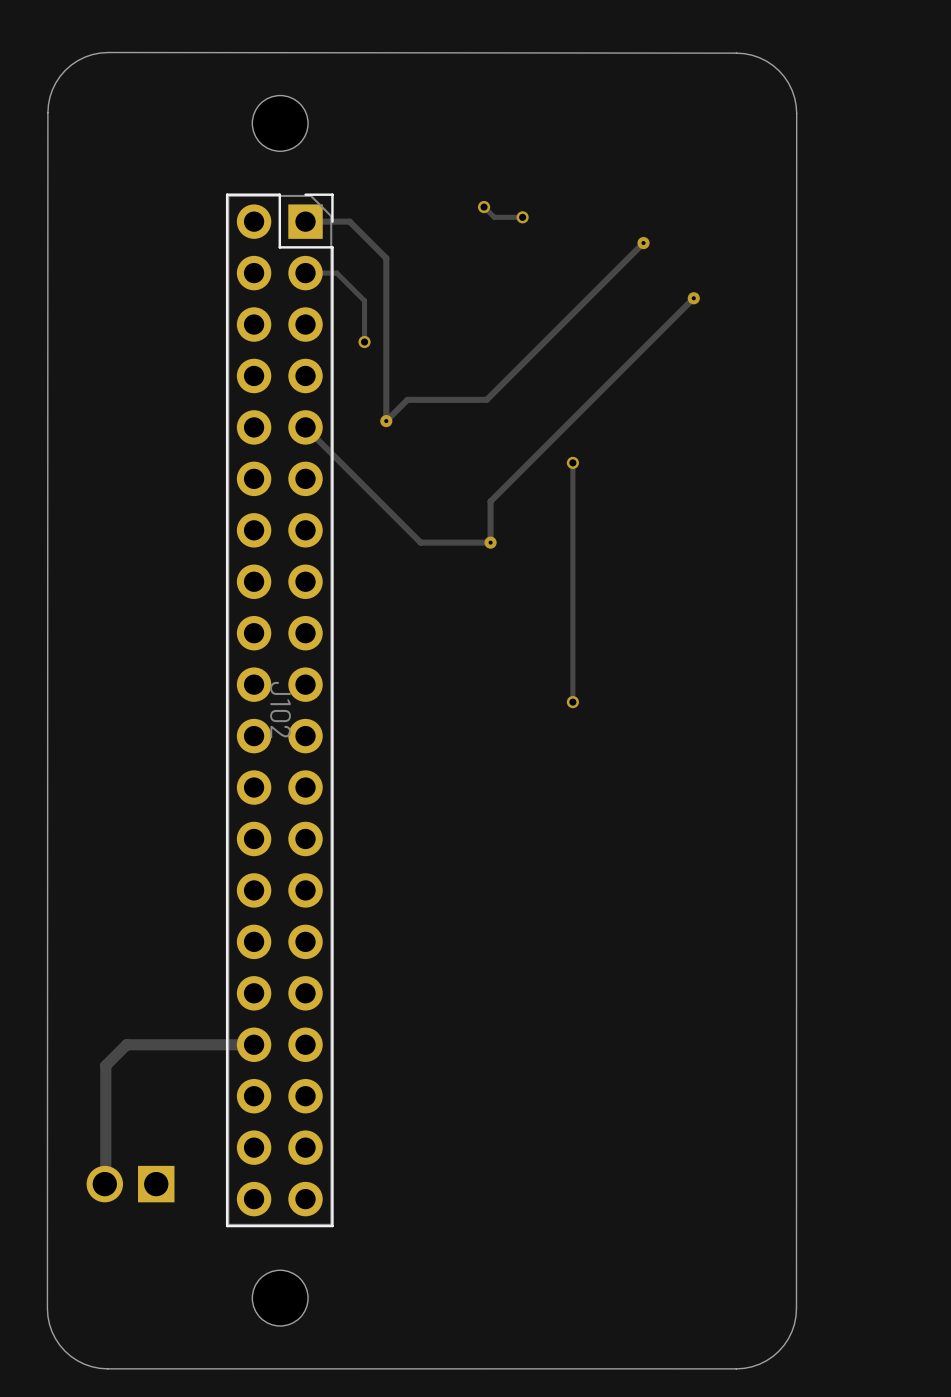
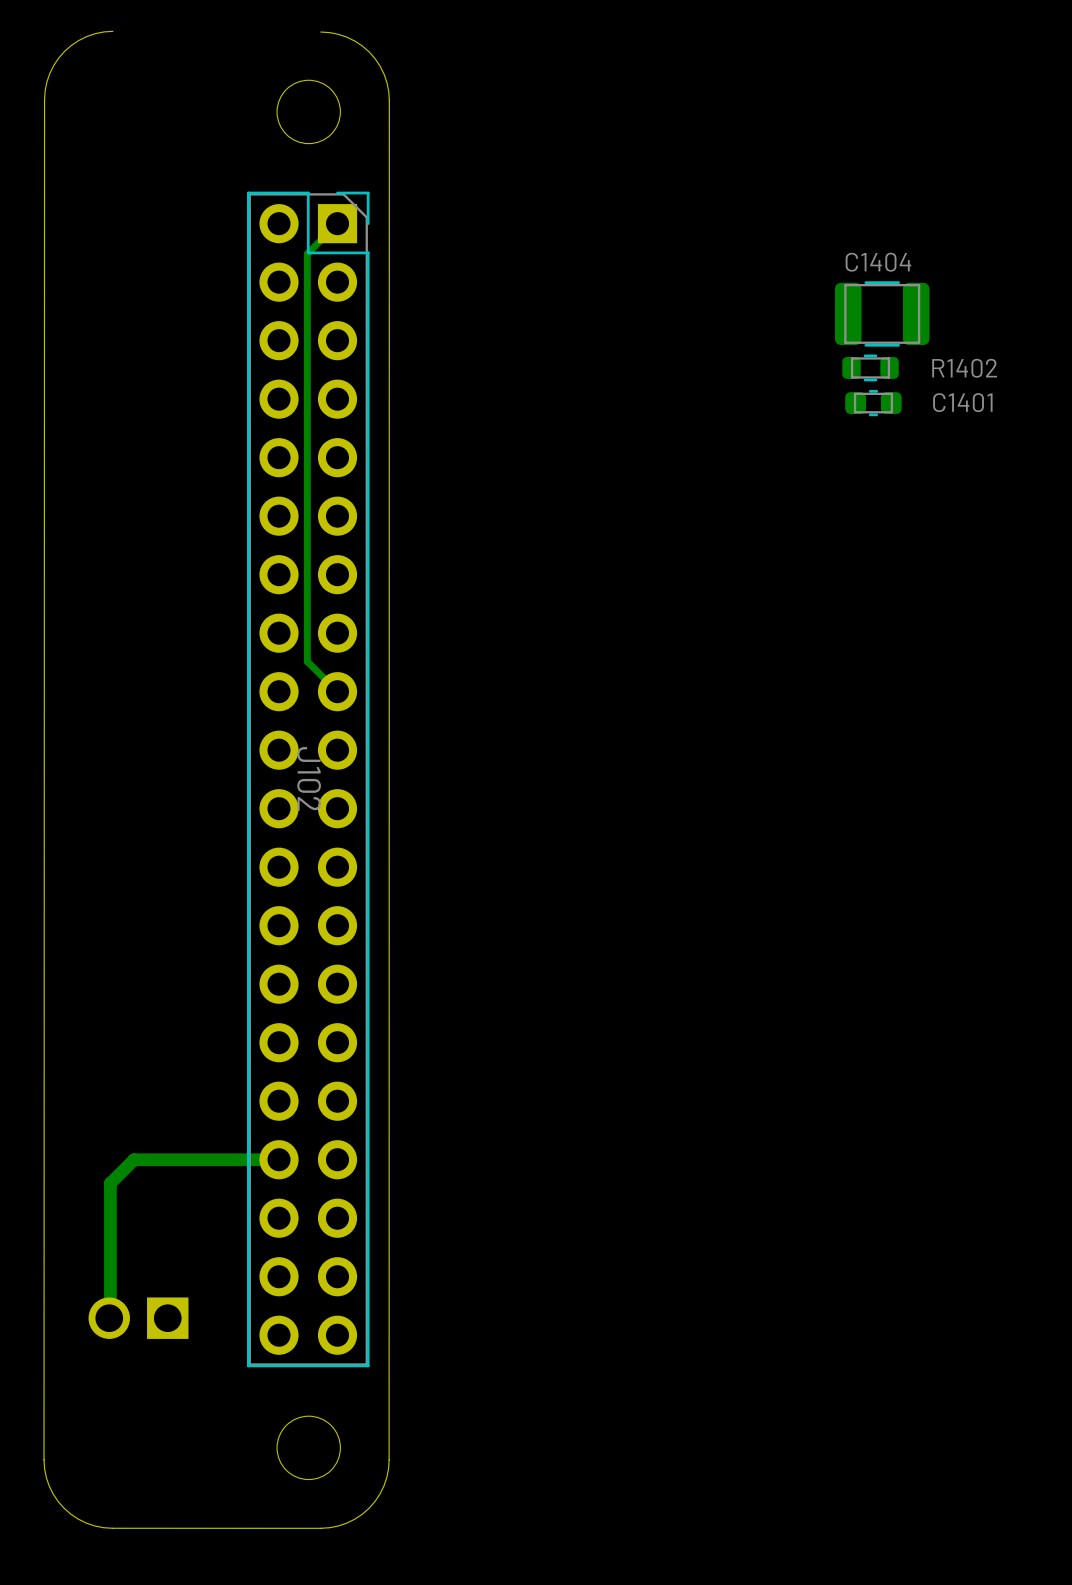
board edge: (108, 52) (736, 53) (752, 55) (766, 61) (779, 70) (788, 83) (794, 97) (796, 113) (796, 1308) (791, 1331) (778, 1351) (766, 1360) (744, 1368) (107, 1368) -> (320, 32) (347, 37) (369, 52) (384, 74) (389, 100) (388, 1468) (383, 1486) (375, 1501) (362, 1514) (338, 1525) (320, 1528) (112, 1528)
track: (484, 207) (494, 217) (522, 217) -> none
via: (484, 207) -> none
via: (522, 217) -> none
track: (305, 221) (349, 221) (386, 258) (386, 421) (407, 399) (486, 399) (643, 243) -> (337, 223) (307, 253) (307, 661) (337, 691)
via: (643, 243) -> none
track: (305, 273) (336, 273) (364, 300) (364, 341) -> none
track: (693, 298) (490, 501) (490, 542) (420, 542) (305, 427) -> none
via: (693, 298) -> none
C1404: none -> (882, 313)
via: (364, 341) -> none
R1402: none -> (870, 367)
C1401: none -> (873, 403)
via: (386, 421) -> none
track: (572, 462) (572, 702) -> none
via: (572, 462) -> none
via: (490, 542) -> none
via: (572, 702) -> none

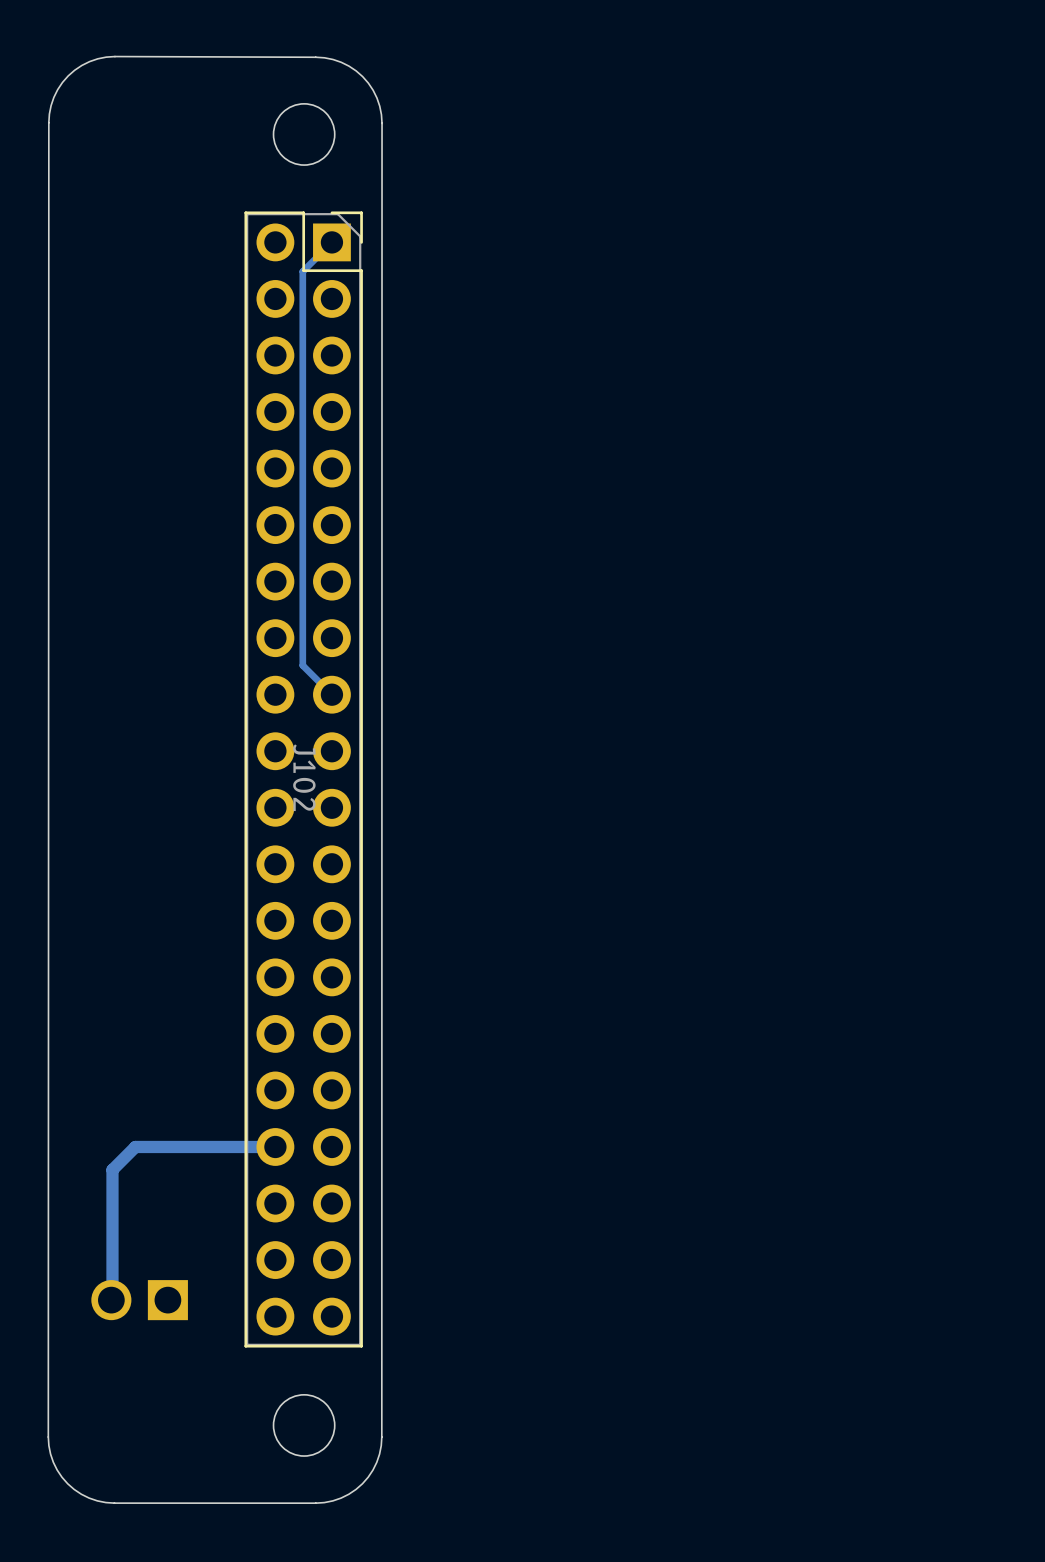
board edge: none -> (114, 56) (315, 57)
C1404: (882, 313) -> none
R1402: (870, 367) -> none
C1401: (873, 403) -> none

